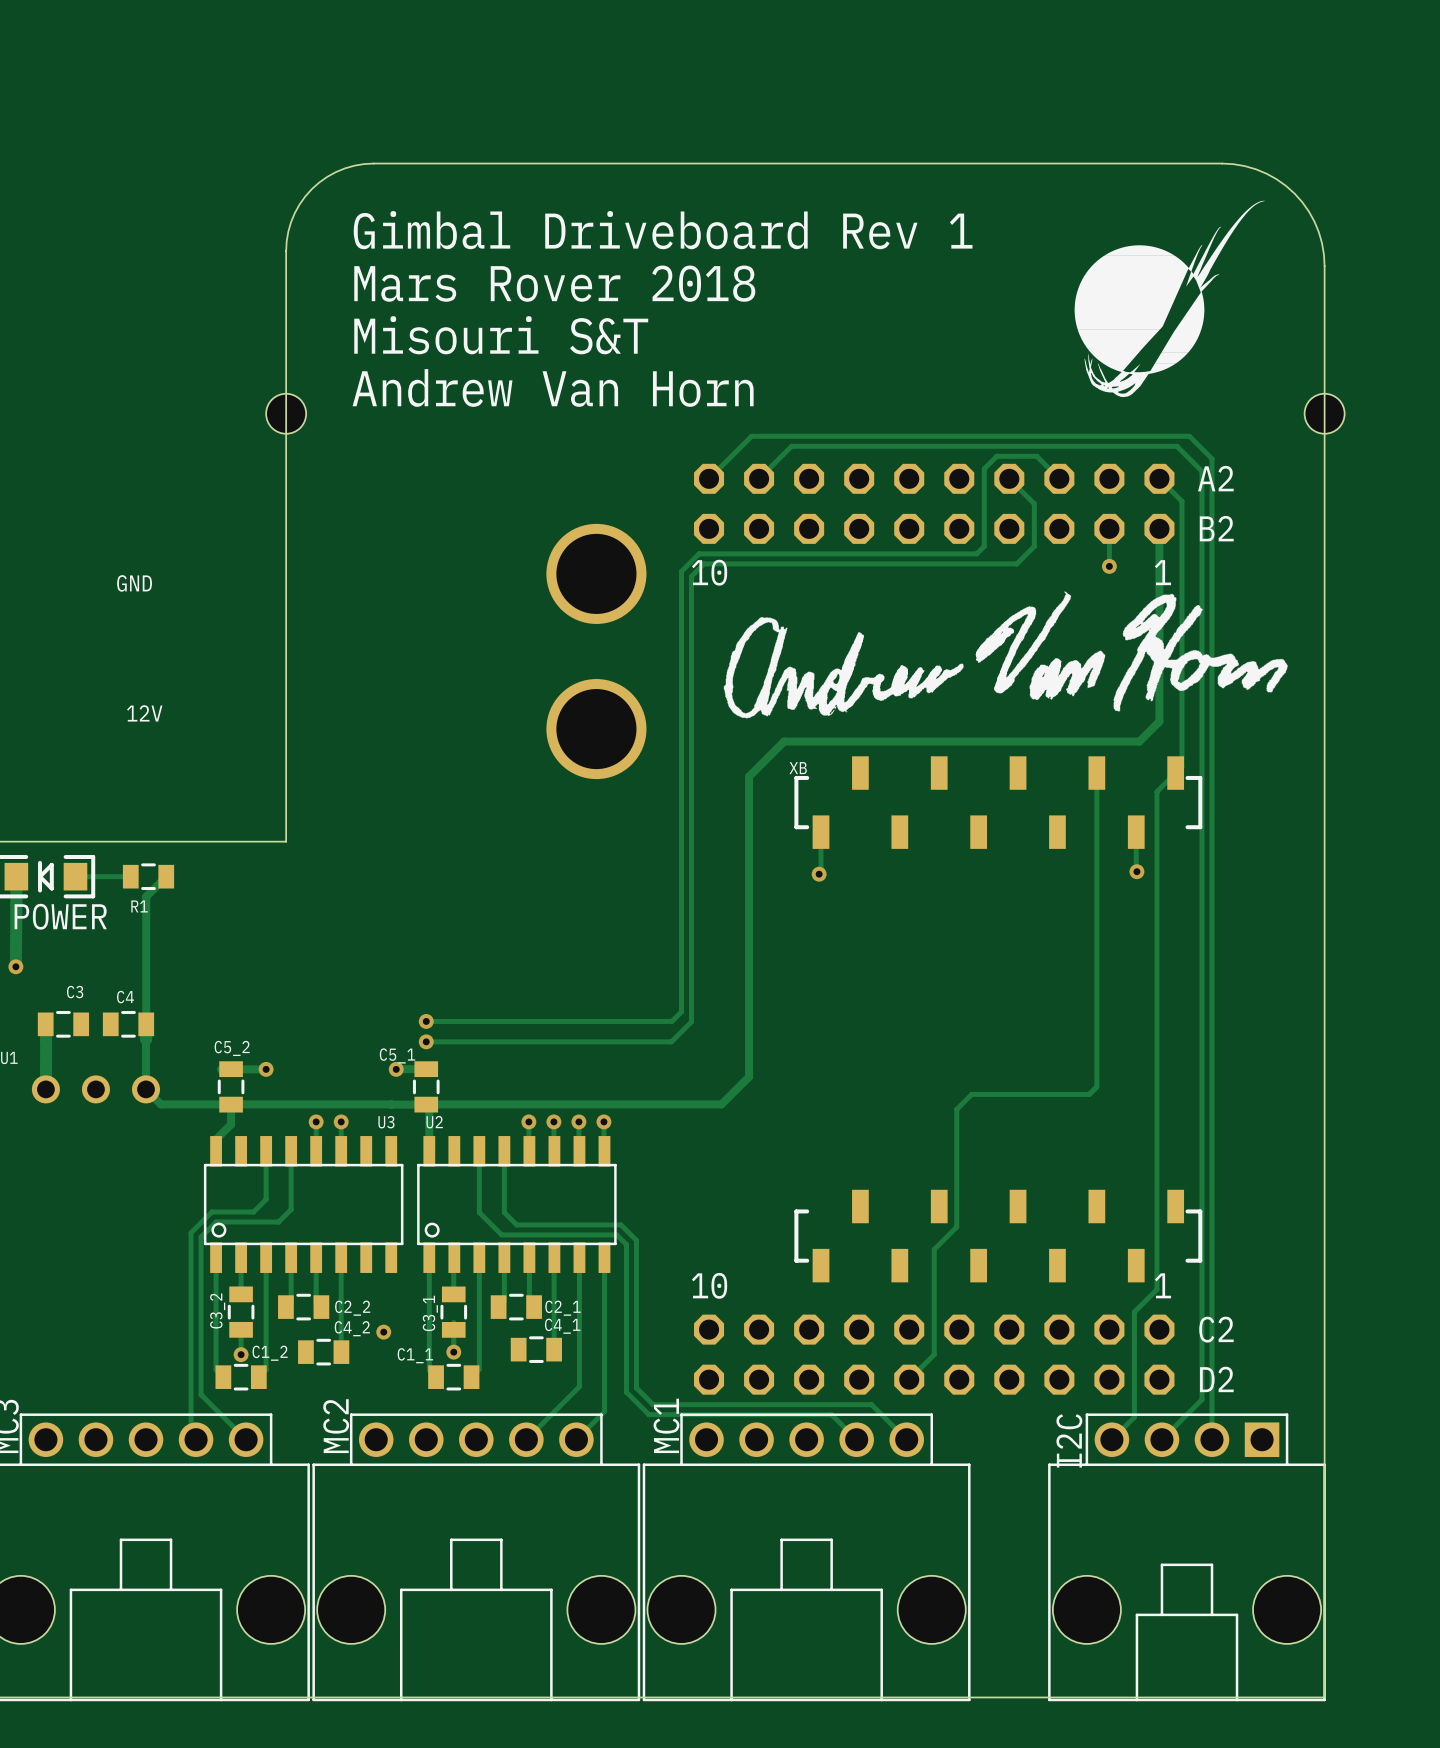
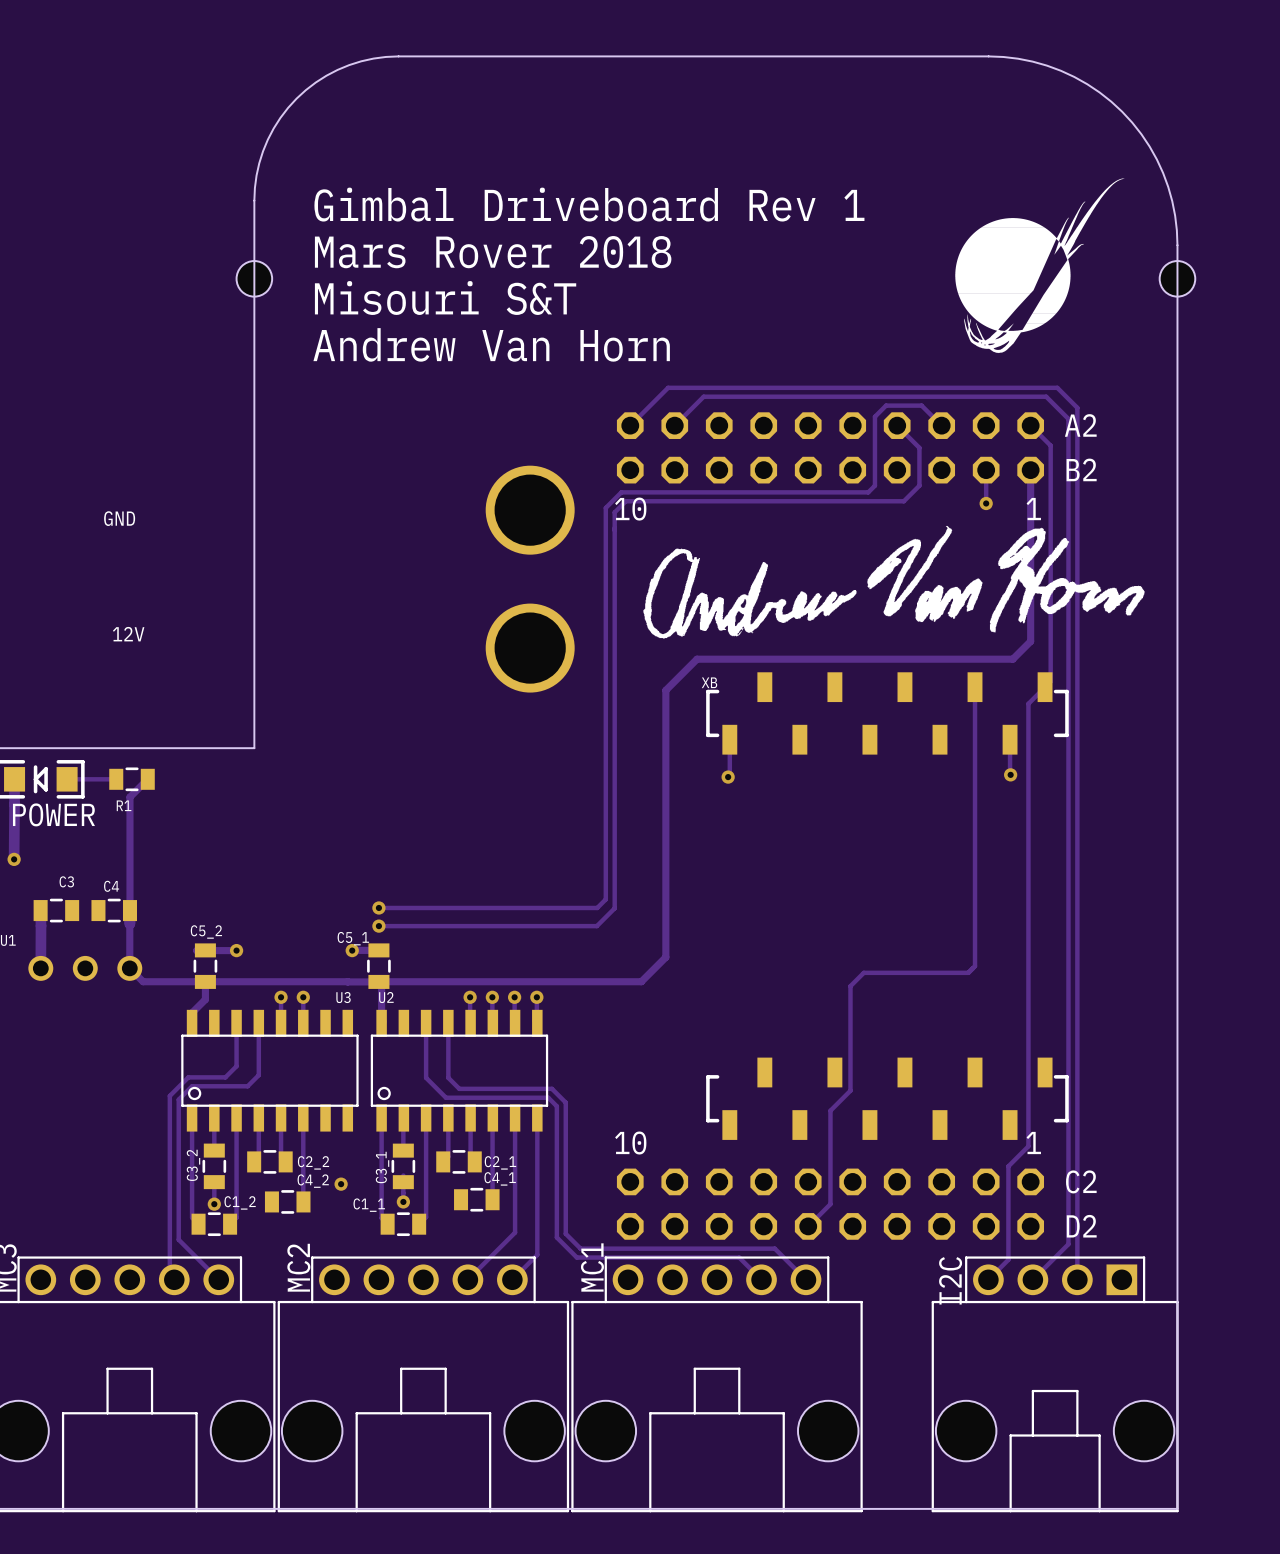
board edge: (286, 251) (291, 222) (299, 204) (311, 189) (335, 172) (363, 164) (1222, 163) (1255, 169) (1276, 179) (1294, 193) (1308, 211) (1318, 232) (1323, 254) (1324, 275) -> (254, 223) (254, 188) (259, 163) (267, 139) (280, 117) (296, 98) (315, 82) (337, 69) (361, 61) (398, 56) (988, 56) (1018, 58) (1060, 70) (1099, 92) (1122, 111) (1141, 134) (1163, 172) (1175, 215) (1177, 245)
hole position: (286, 413) -> (254, 278)
hole position: (1324, 413) -> (1177, 278)

